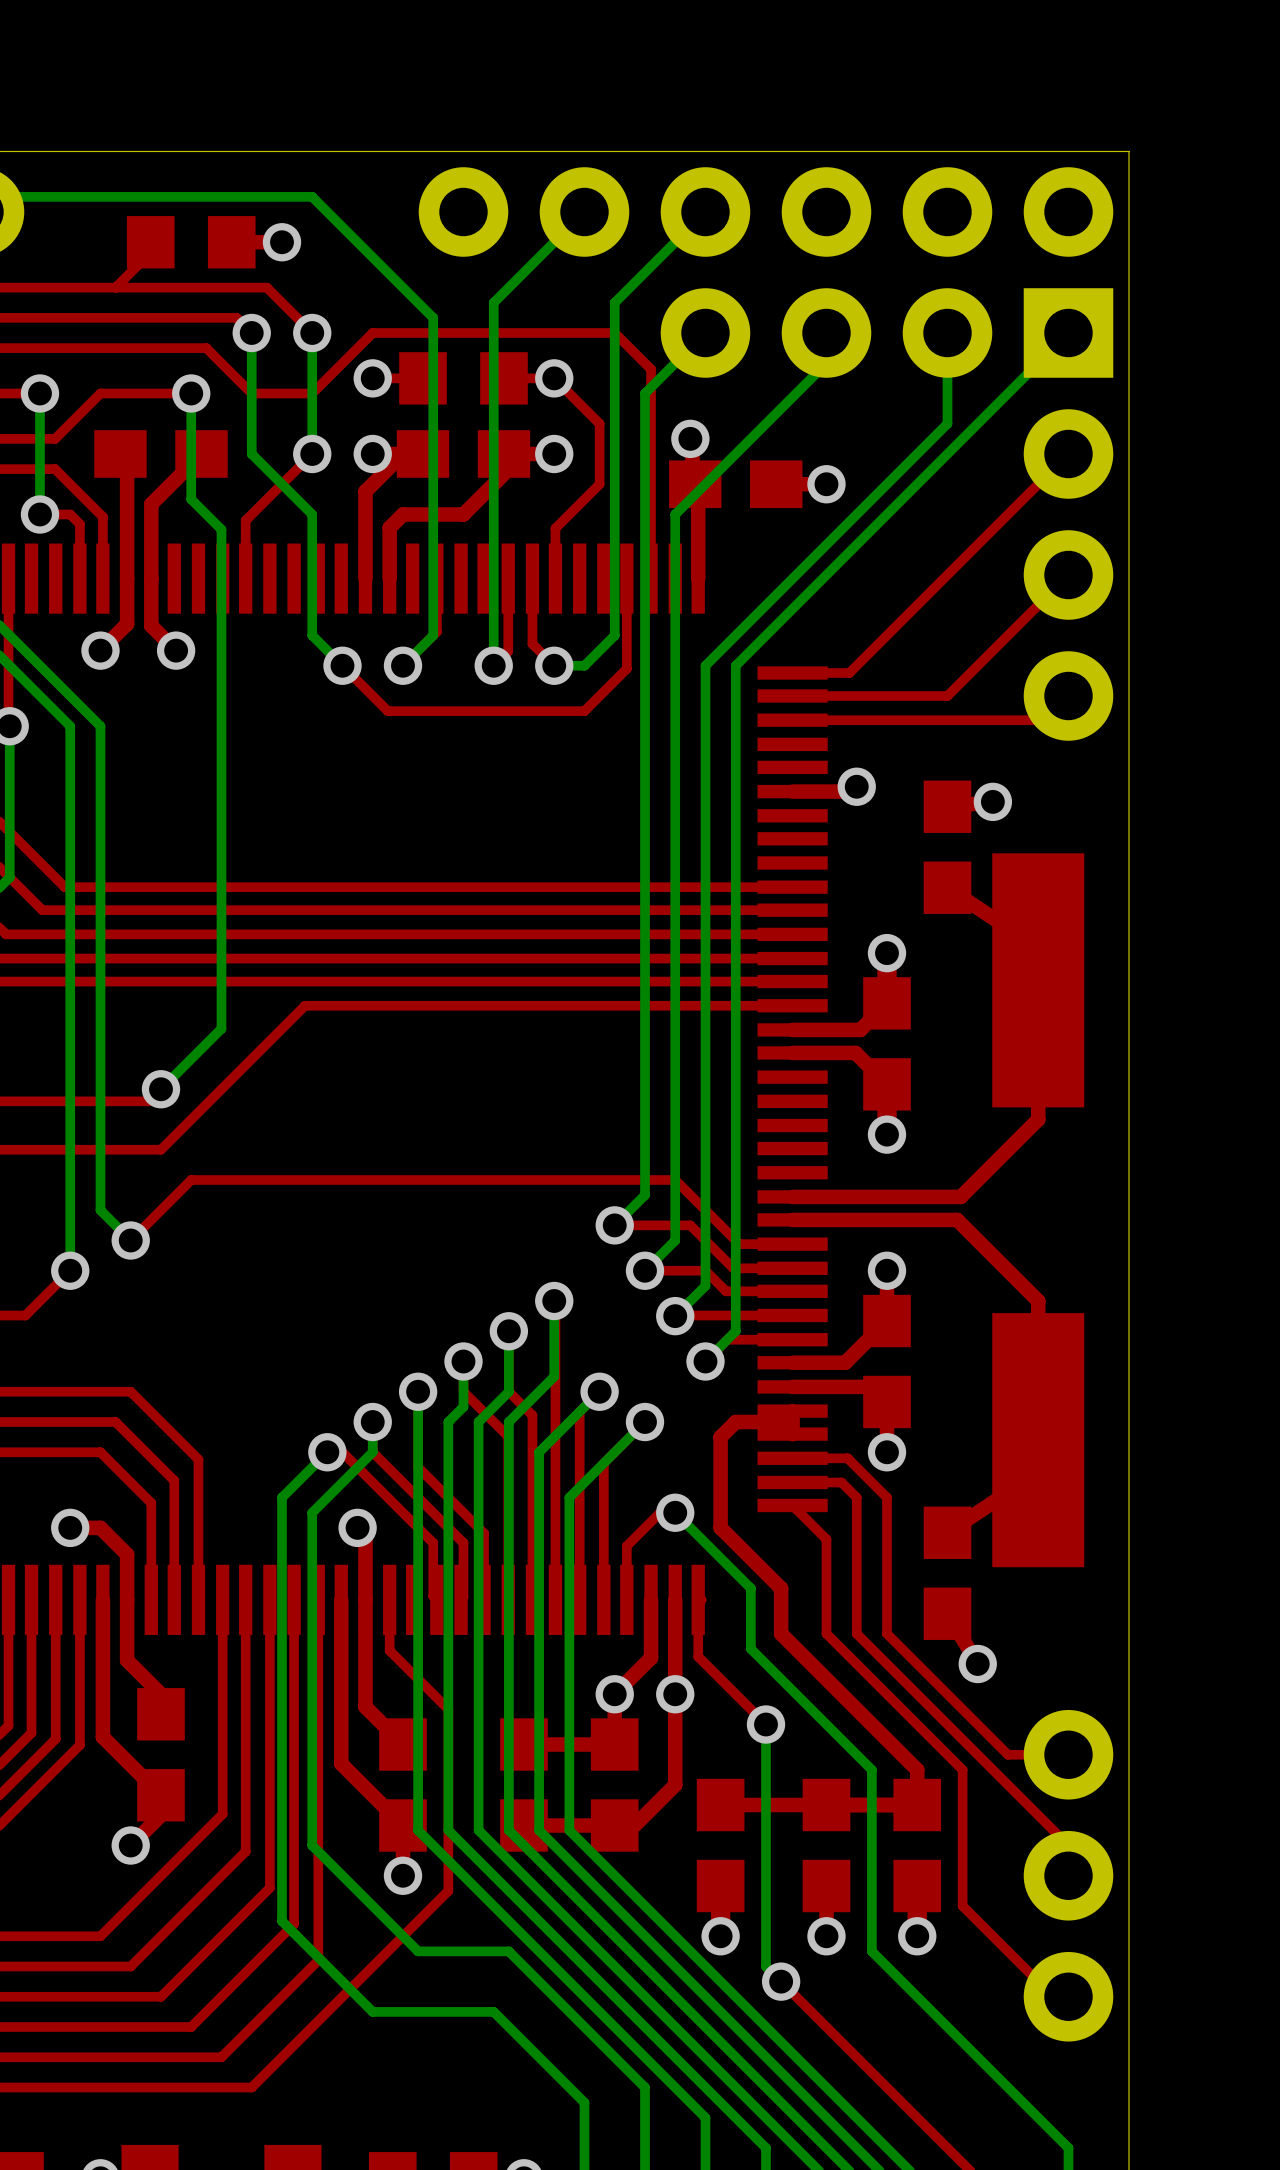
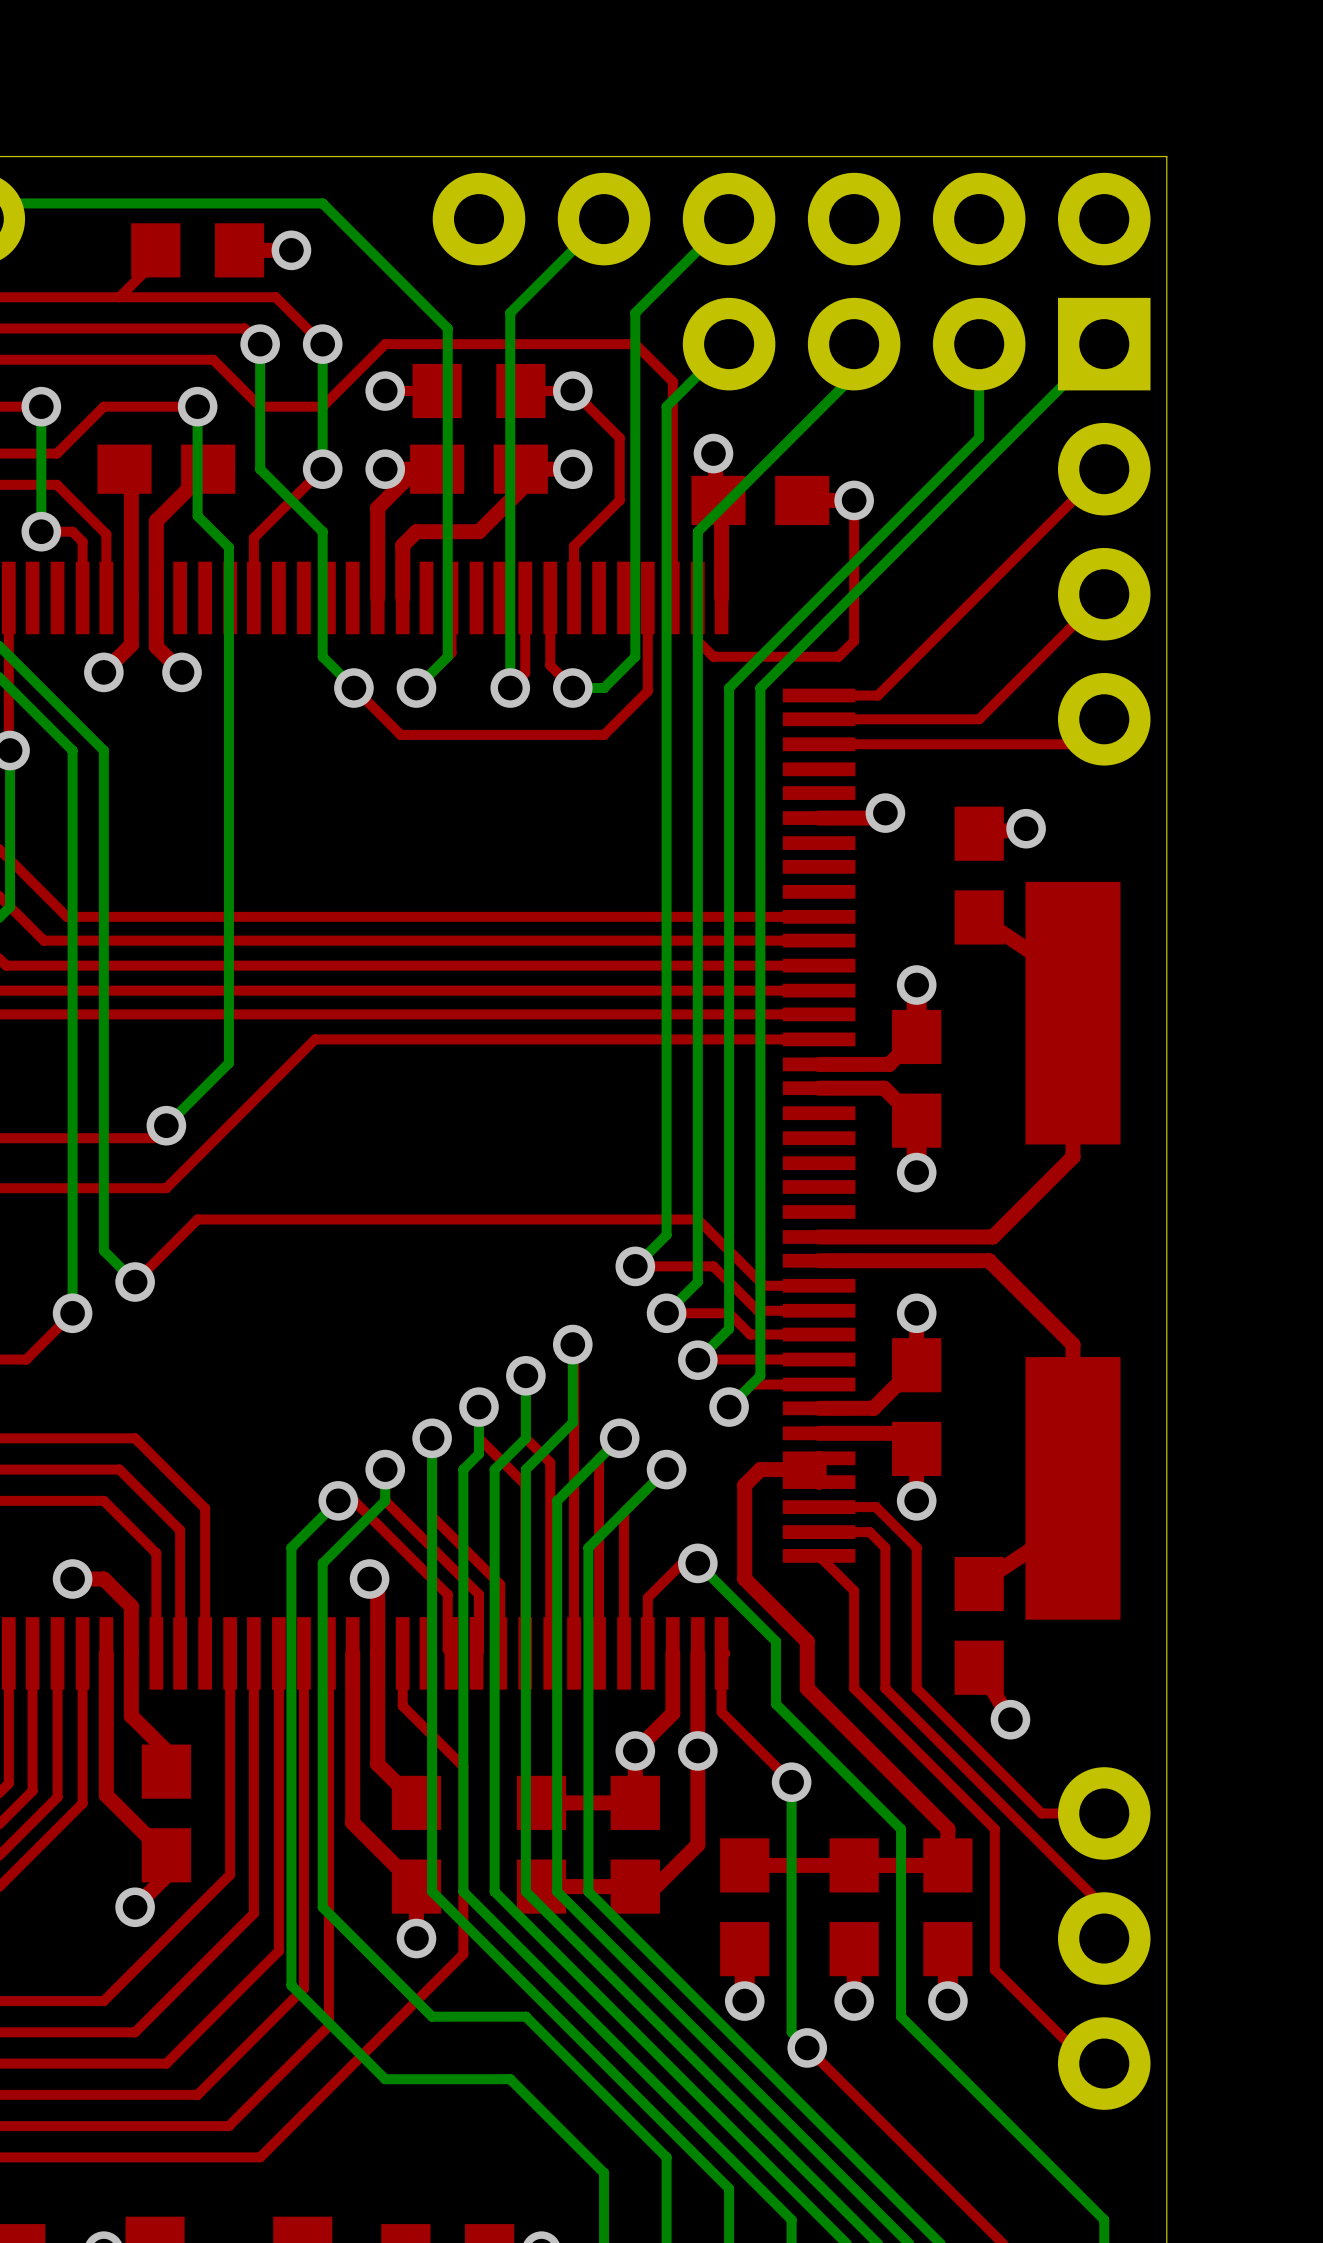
top track: none -> (854, 500) (854, 641) (838, 656) (713, 656) (697, 641) (697, 597)

